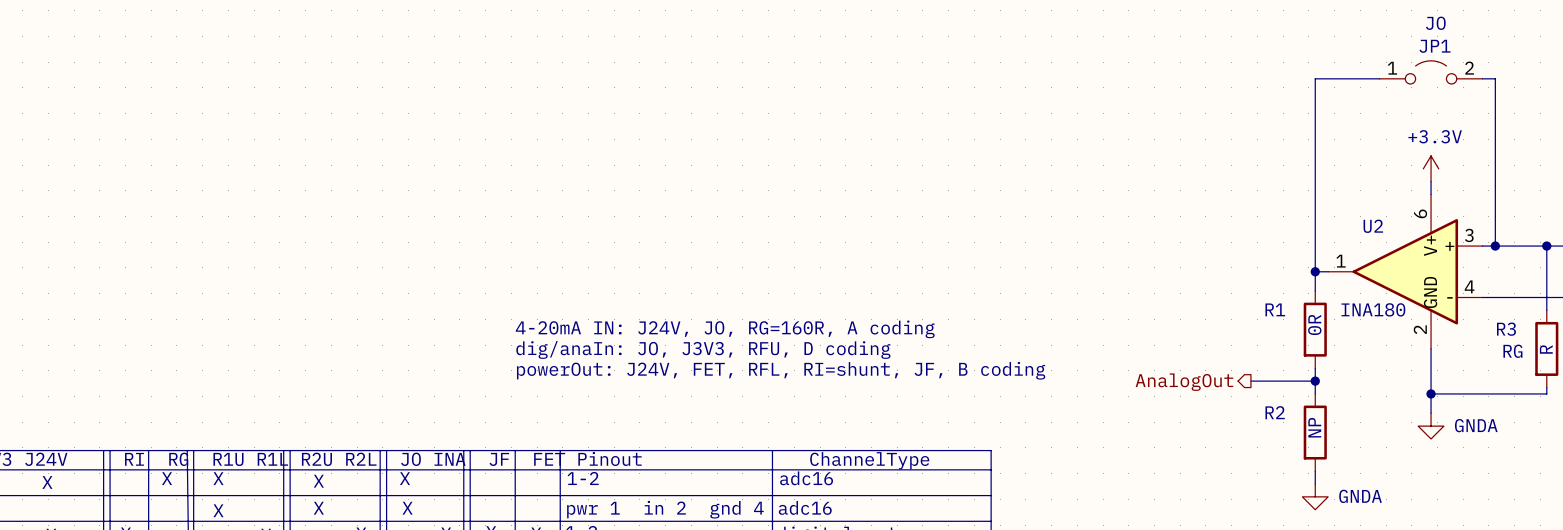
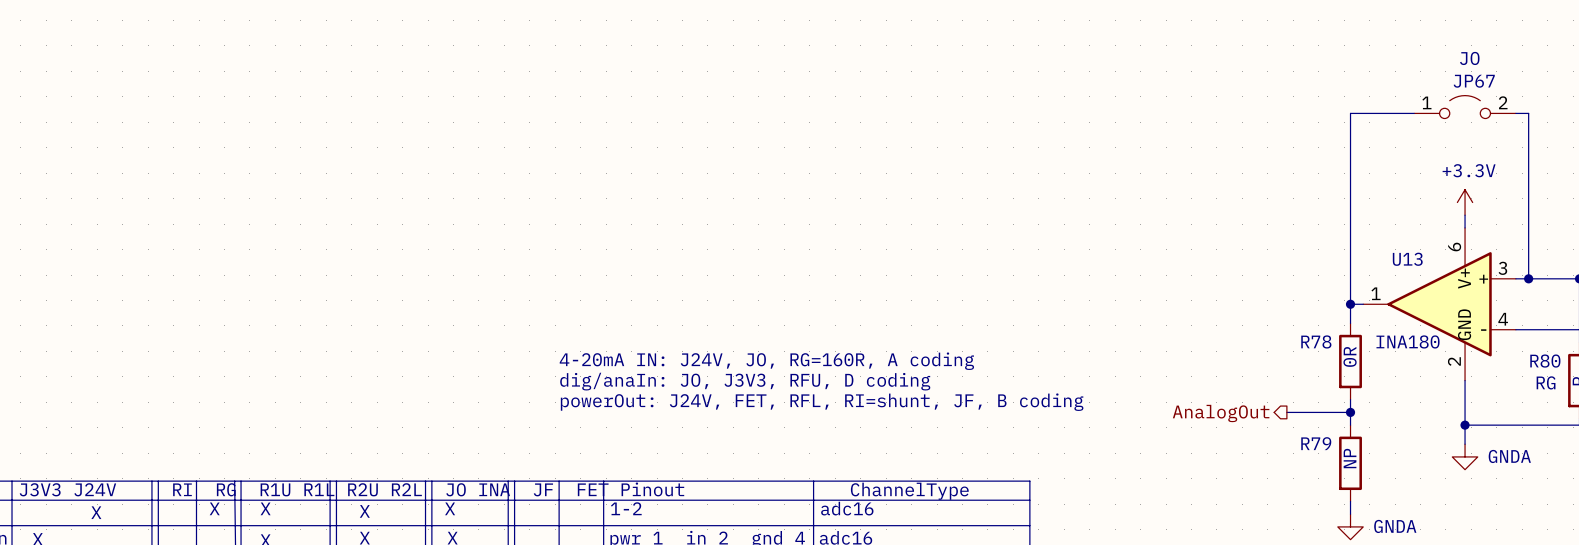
JP1 name: JP1 (1435, 46) -> JP67 (1474, 81)
U2 name: U2 (1373, 226) -> U13 (1407, 259)
R1 name: R1 (1275, 309) -> R78 (1316, 341)
R3 name: R3 (1506, 329) -> R80 (1545, 361)
R2 name: R2 (1275, 412) -> R79 (1316, 443)

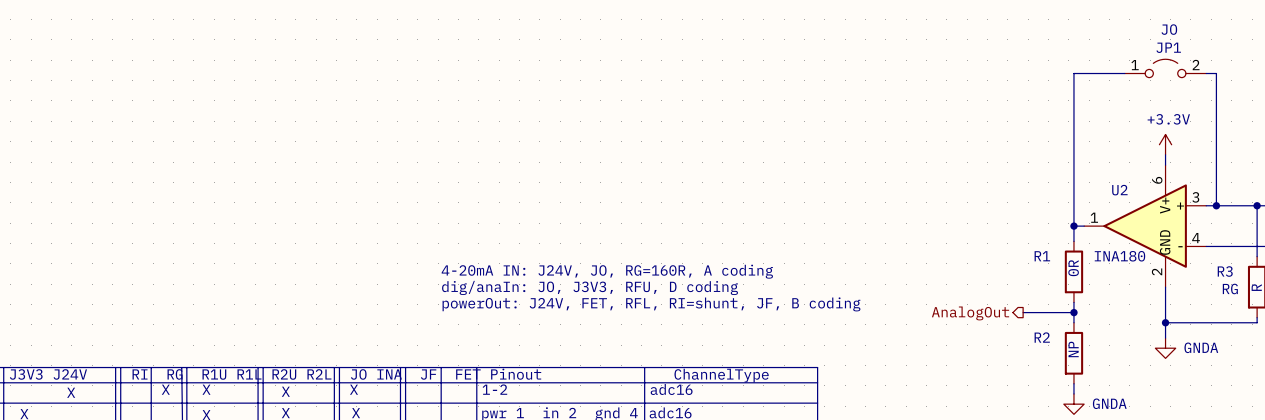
JP67 name: JP67 (1474, 81) -> JP1 (1168, 47)
U13 name: U13 (1407, 259) -> U2 (1119, 190)
R78 name: R78 (1316, 341) -> R1 (1042, 256)
R80 name: R80 (1545, 361) -> R3 (1225, 271)
R79 name: R79 (1316, 443) -> R2 (1042, 337)

